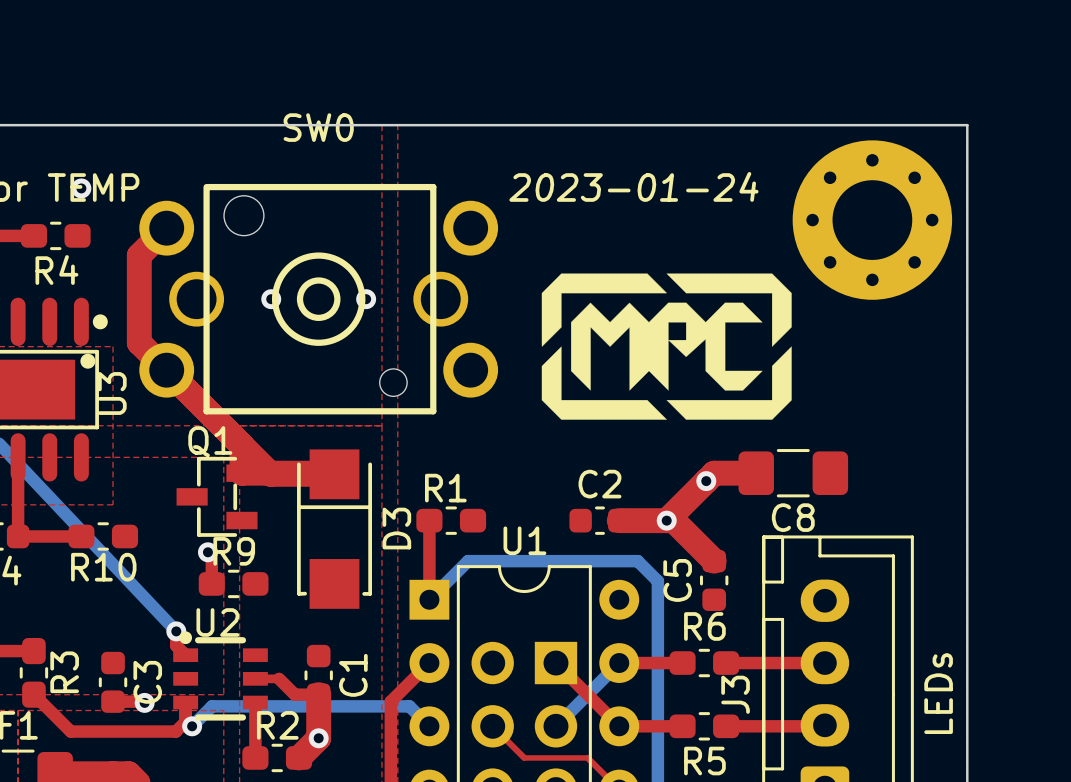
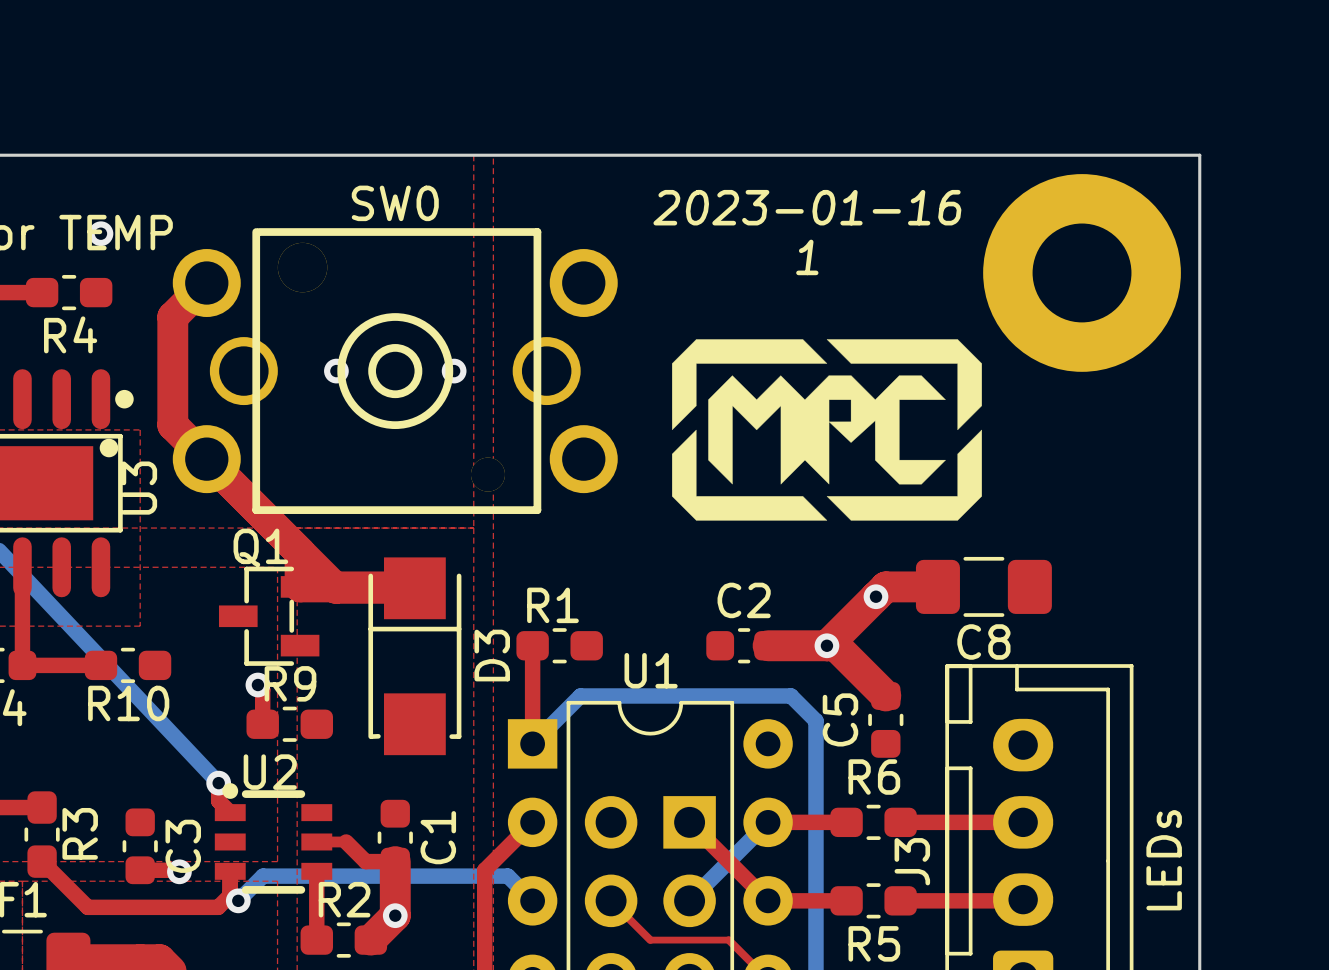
part footprint: [792, 140, 953, 300] -> [983, 174, 1181, 372]
SW0 footprint: [139, 183, 499, 415] -> [172, 228, 618, 514]
text: 2023-01-24 (633, 186) -> 2023-01-16 (807, 207)
text: none -> 1 (807, 257)

